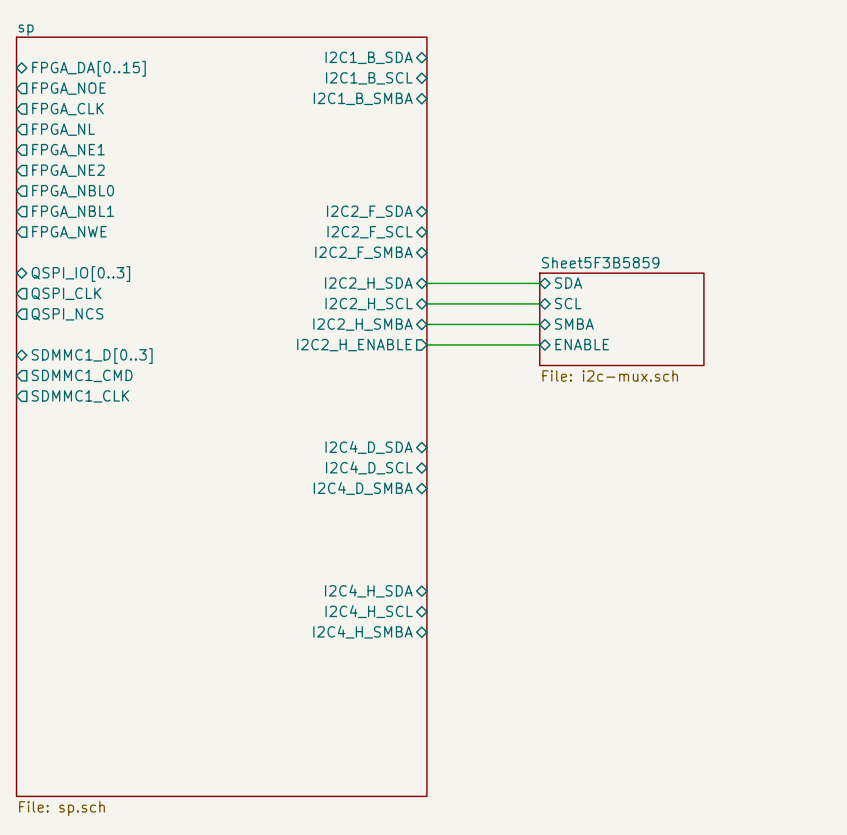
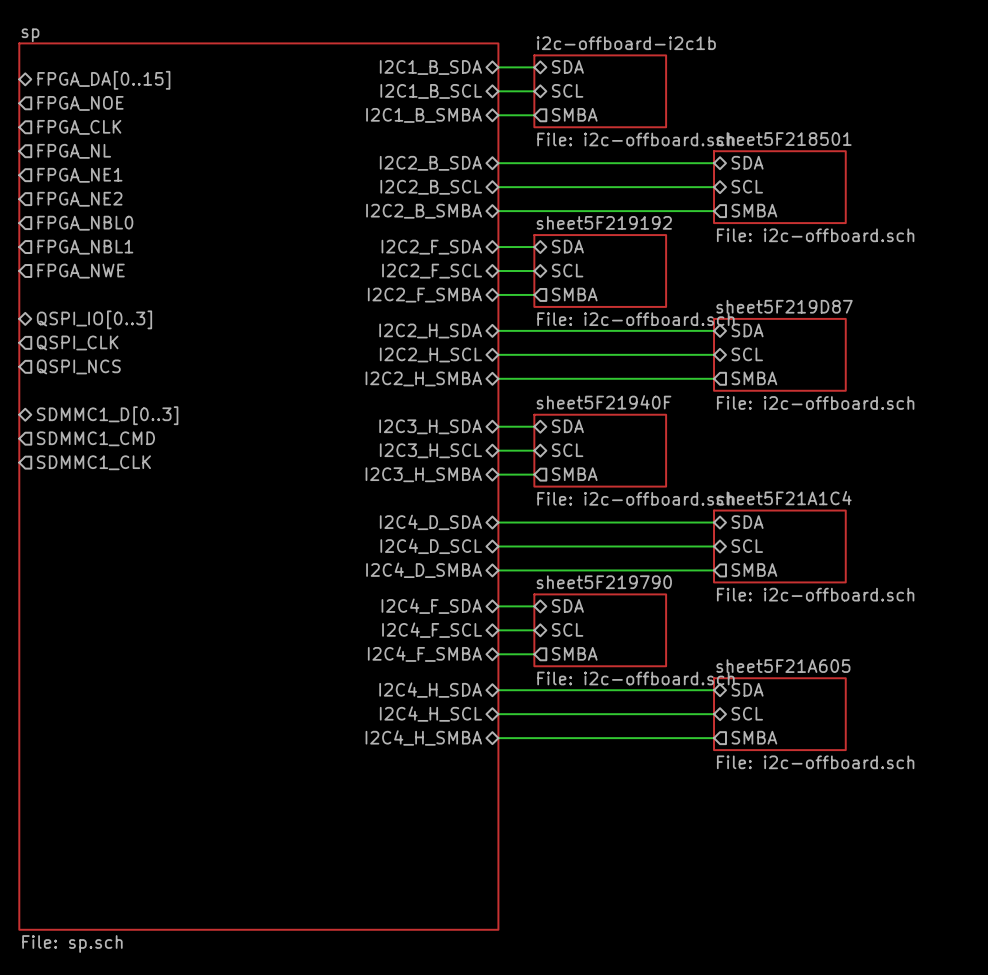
wire: none -> (498, 67) (534, 67)
sheet pin: none -> SDA (567, 66)
sheet pin: none -> SCL (567, 90)
wire: none -> (498, 91) (534, 91)
sheet i2c-offboard-i2c1b: none -> File: i2c-offboard.sch (600, 91)
wire: none -> (498, 115) (534, 115)
sheet pin: none -> SMBA (574, 114)
sheet pin: none -> I2C2_B_SDA (430, 163)
wire: none -> (498, 163) (714, 163)
sheet pin: none -> SDA (747, 162)
sheet pin: none -> SCL (747, 186)
sheet pin: none -> I2C2_B_SCL (431, 187)
wire: none -> (498, 187) (714, 187)
sheet sheet5F218501: none -> File: i2c-offboard.sch (779, 187)
sheet pin: none -> I2C2_B_SMBA (424, 211)
wire: none -> (498, 211) (714, 211)
sheet pin: none -> SMBA (754, 210)
wire: none -> (498, 247) (534, 247)
sheet pin: none -> SDA (567, 246)
sheet pin: none -> SCL (567, 270)
wire: none -> (498, 270) (534, 270)
sheet sheet5F219192: none -> File: i2c-offboard.sch (600, 270)
wire: none -> (498, 294) (534, 294)
sheet pin: none -> SMBA (574, 294)
wire: none -> (630, 330) (714, 330)
sheet pin: SDA (568, 283) -> none
sheet pin: none -> SDA (747, 330)
wire: none -> (630, 354) (714, 354)
sheet pin: SCL (568, 303) -> none
sheet pin: none -> SCL (747, 354)
sheet sheet5F219D87: none -> File: i2c-offboard.sch (779, 354)
sheet Sheet5F3B5859: File: i2c-mux.sch (621, 319) -> none
wire: none -> (630, 378) (714, 378)
sheet pin: SMBA (574, 324) -> none
sheet pin: none -> SMBA (754, 378)
wire: (426, 344) (539, 344) -> none
sheet pin: ENABLE (582, 344) -> none
sheet pin shape: output (354, 345) -> bidirectional (430, 426)
sheet pin: I2C2_H_ENABLE (354, 345) -> I2C3_H_SDA (430, 426)
wire: none -> (498, 426) (534, 426)
sheet pin: none -> SDA (567, 426)
sheet pin: none -> SCL (567, 450)
sheet pin: none -> I2C3_H_SCL (430, 450)
wire: none -> (498, 450) (534, 450)
sheet sheet5F21940F: none -> File: i2c-offboard.sch (600, 450)
sheet pin: none -> I2C3_H_SMBA (423, 474)
wire: none -> (498, 474) (534, 474)
sheet pin: none -> SMBA (574, 474)
wire: none -> (498, 522) (714, 522)
sheet pin: none -> SDA (747, 522)
sheet pin: none -> SCL (747, 546)
wire: none -> (498, 546) (714, 546)
sheet sheet5F21A1C4: none -> File: i2c-offboard.sch (779, 546)
wire: none -> (498, 570) (714, 570)
sheet pin: none -> SMBA (754, 569)
sheet pin: none -> I2C4_F_SDA (431, 606)
wire: none -> (498, 606) (534, 606)
sheet pin: none -> SDA (567, 605)
sheet pin: none -> I2C4_F_SCL (432, 630)
wire: none -> (498, 630) (534, 630)
sheet pin: none -> SCL (567, 629)
sheet sheet5F219790: none -> File: i2c-offboard.sch (600, 630)
sheet pin: none -> I2C4_F_SMBA (424, 654)
wire: none -> (498, 654) (534, 654)
sheet pin: none -> SMBA (574, 653)
sheet pin: none -> SDA (747, 689)
wire: none -> (498, 690) (714, 690)
wire: none -> (498, 714) (714, 714)
sheet pin: none -> SCL (747, 713)
sheet sheet5F21A605: none -> File: i2c-offboard.sch (779, 714)
sheet pin: none -> SMBA (754, 737)
wire: none -> (498, 738) (714, 738)

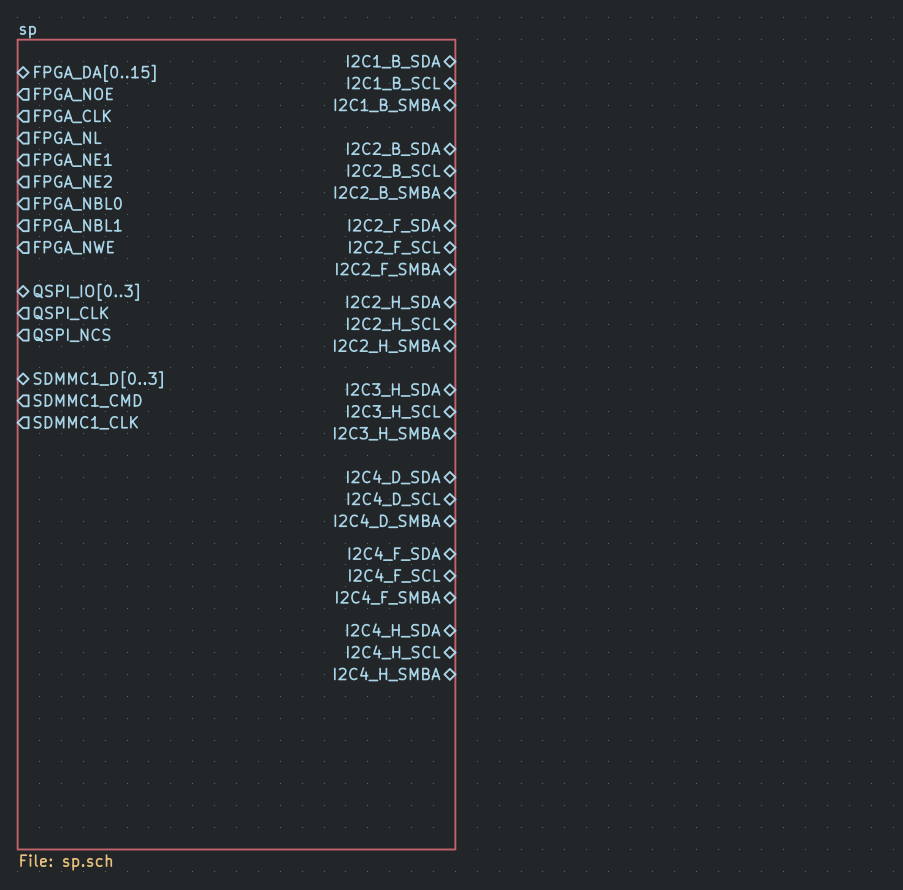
sheet pin: SDA (567, 66) -> none
wire: (498, 67) (534, 67) -> none
sheet pin: SCL (567, 90) -> none
wire: (498, 91) (534, 91) -> none
sheet i2c-offboard-i2c1b: File: i2c-offboard.sch (600, 91) -> none
sheet pin: SMBA (574, 114) -> none
wire: (498, 115) (534, 115) -> none
sheet pin: SDA (747, 162) -> none
wire: (498, 163) (714, 163) -> none
sheet pin: SCL (747, 186) -> none
wire: (498, 187) (714, 187) -> none
sheet sheet5F218501: File: i2c-offboard.sch (779, 187) -> none
sheet pin: SMBA (754, 210) -> none
wire: (498, 211) (714, 211) -> none
sheet pin: SDA (567, 246) -> none
wire: (498, 247) (534, 247) -> none
wire: (498, 270) (534, 270) -> none
sheet pin: SCL (567, 270) -> none
sheet sheet5F219192: File: i2c-offboard.sch (600, 270) -> none
wire: (498, 294) (534, 294) -> none
sheet pin: SMBA (574, 294) -> none
wire: (498, 330) (714, 330) -> none
sheet pin: SDA (747, 330) -> none
wire: (498, 354) (714, 354) -> none
sheet pin: SCL (747, 354) -> none
sheet sheet5F219D87: File: i2c-offboard.sch (779, 354) -> none
wire: (498, 378) (714, 378) -> none
sheet pin: SMBA (754, 378) -> none
wire: (498, 426) (534, 426) -> none
sheet pin: SDA (567, 426) -> none
wire: (498, 450) (534, 450) -> none
sheet pin: SCL (567, 450) -> none
sheet sheet5F21940F: File: i2c-offboard.sch (600, 450) -> none
wire: (498, 474) (534, 474) -> none
sheet pin: SMBA (574, 474) -> none
wire: (498, 522) (714, 522) -> none
sheet pin: SDA (747, 522) -> none
wire: (498, 546) (714, 546) -> none
sheet pin: SCL (747, 546) -> none
sheet sheet5F21A1C4: File: i2c-offboard.sch (779, 546) -> none
sheet pin: SMBA (754, 569) -> none
wire: (498, 570) (714, 570) -> none
sheet pin: SDA (567, 605) -> none
wire: (498, 606) (534, 606) -> none
sheet pin: SCL (567, 629) -> none
wire: (498, 630) (534, 630) -> none
sheet sheet5F219790: File: i2c-offboard.sch (600, 630) -> none
sheet pin: SMBA (574, 653) -> none
wire: (498, 654) (534, 654) -> none
sheet pin: SDA (747, 689) -> none
wire: (498, 690) (714, 690) -> none
sheet pin: SCL (747, 713) -> none
wire: (498, 714) (714, 714) -> none
sheet sheet5F21A605: File: i2c-offboard.sch (779, 714) -> none
sheet pin: SMBA (754, 737) -> none
wire: (498, 738) (714, 738) -> none

